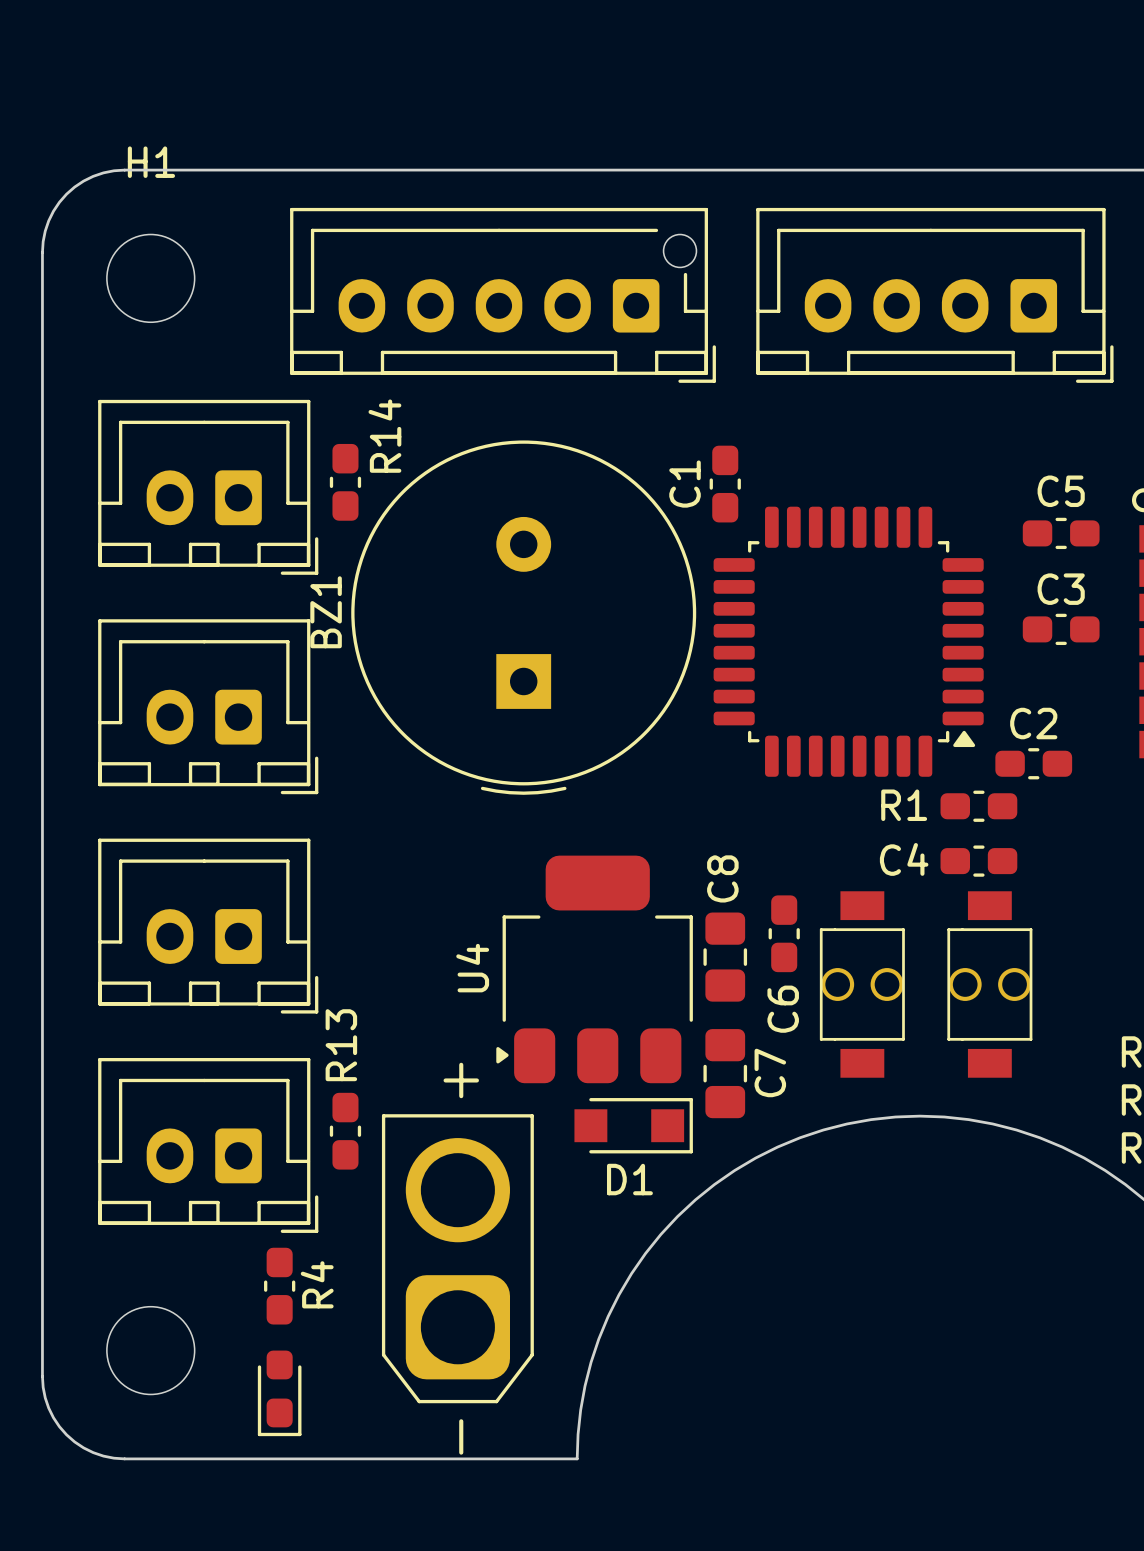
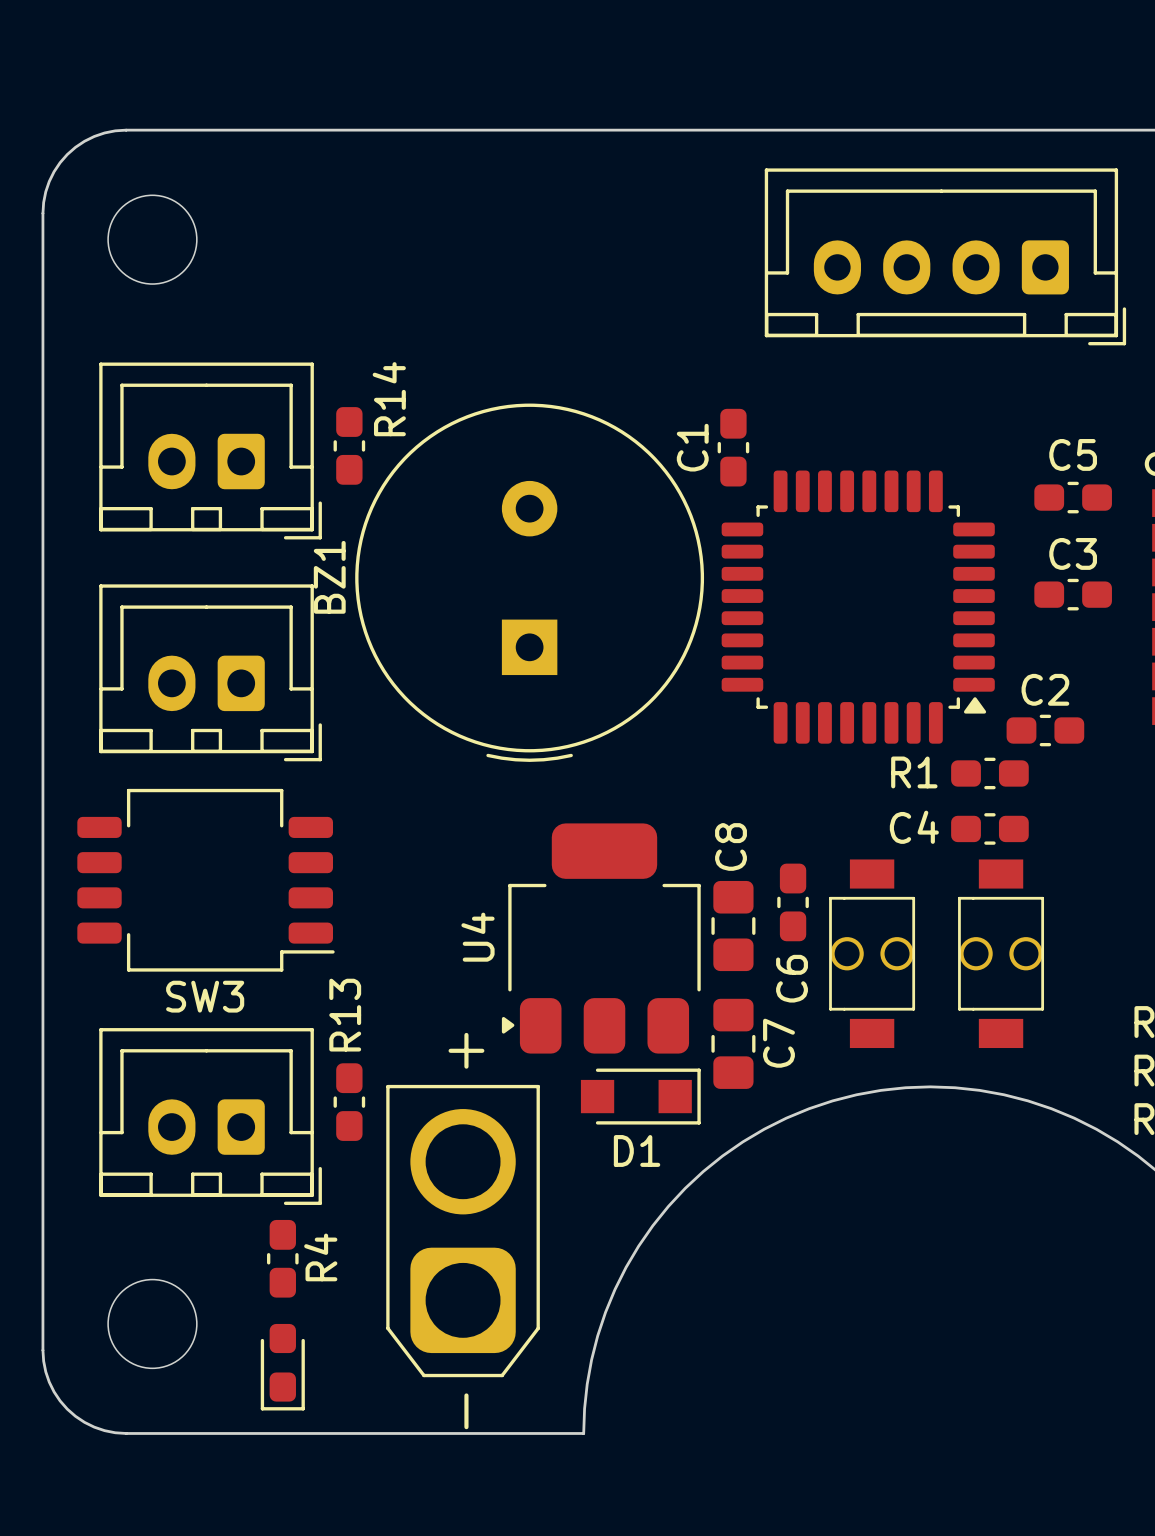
H1 name: H1 (151, 162) -> none
part: (503, 295) -> none
SW3: none -> (206, 880)
part: (208, 926) -> none

